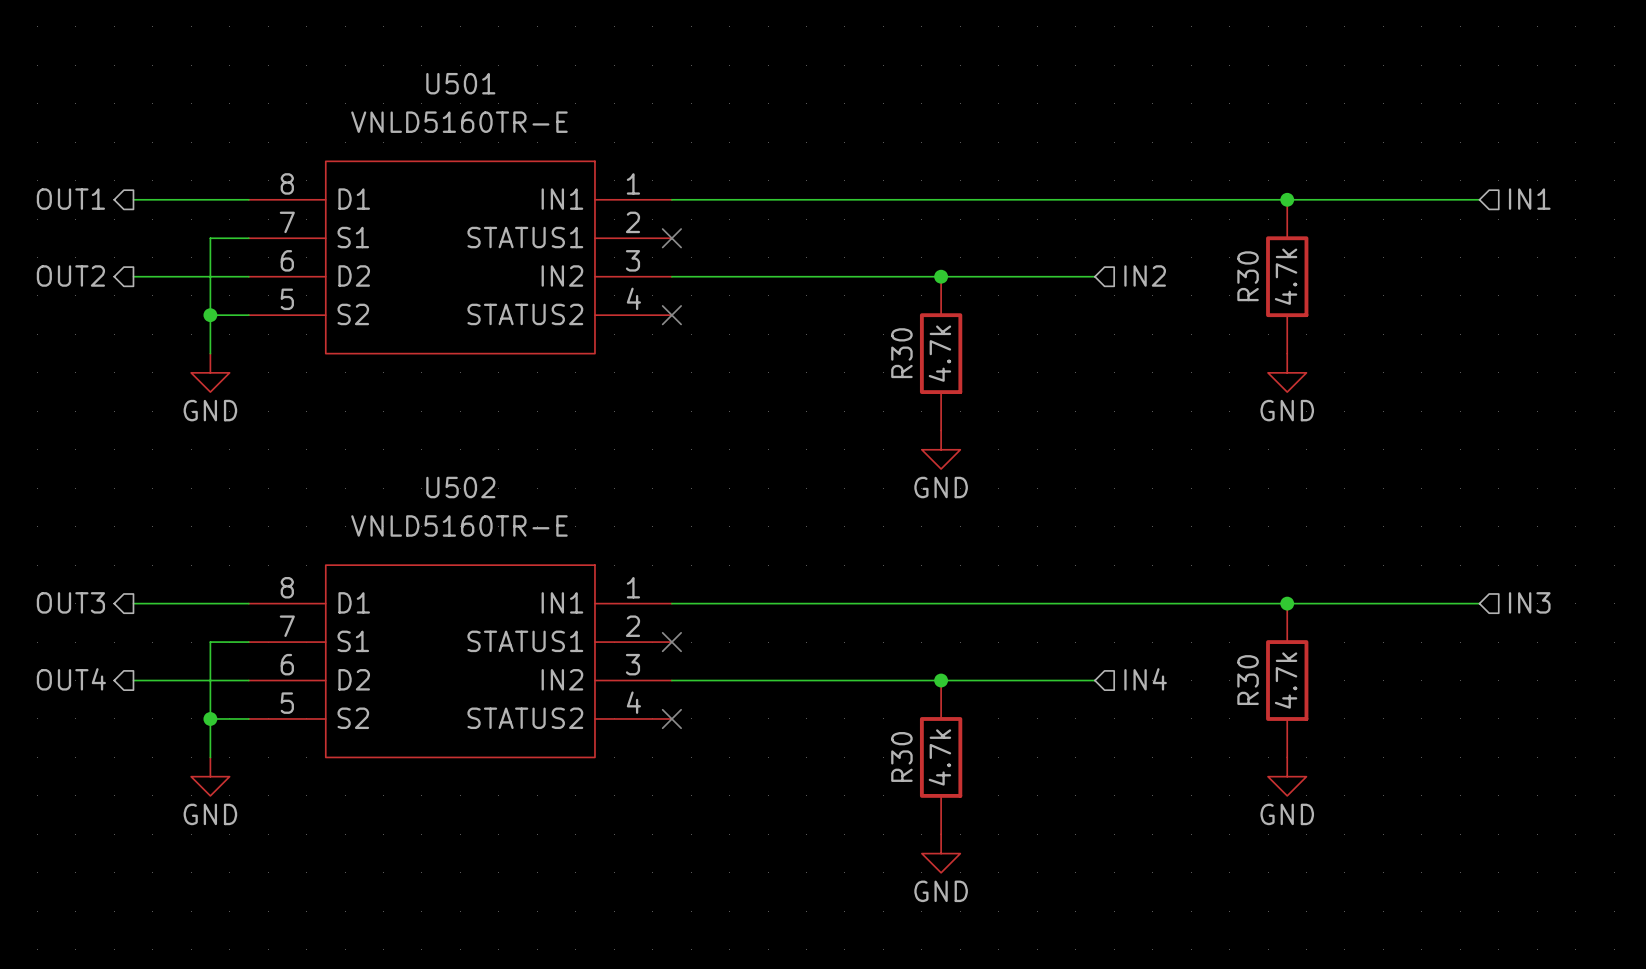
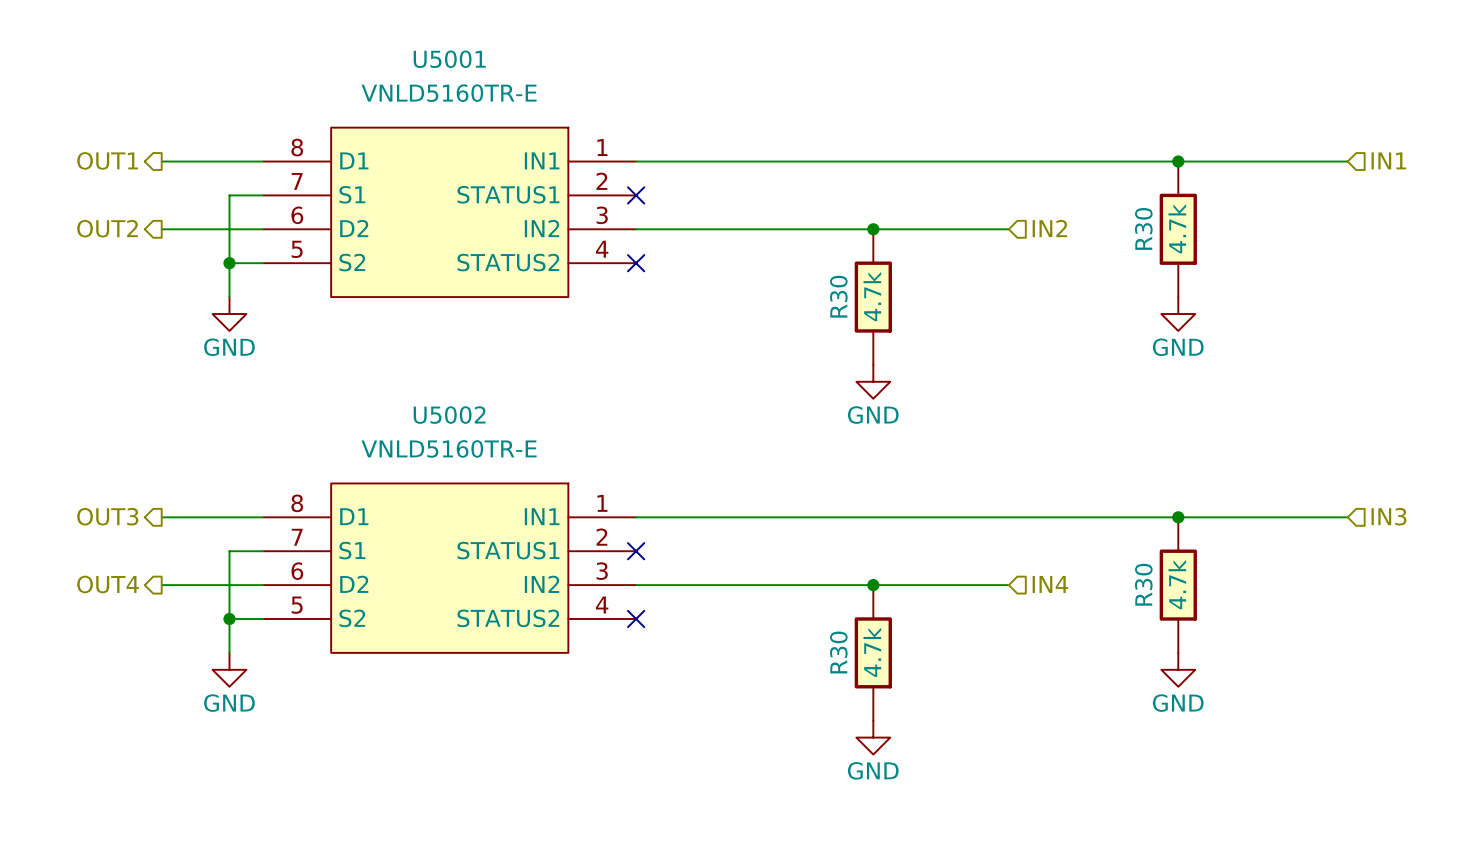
U501 name: U501 (460, 83) -> U5001 (449, 59)
U502 name: U502 (460, 487) -> U5002 (449, 415)

